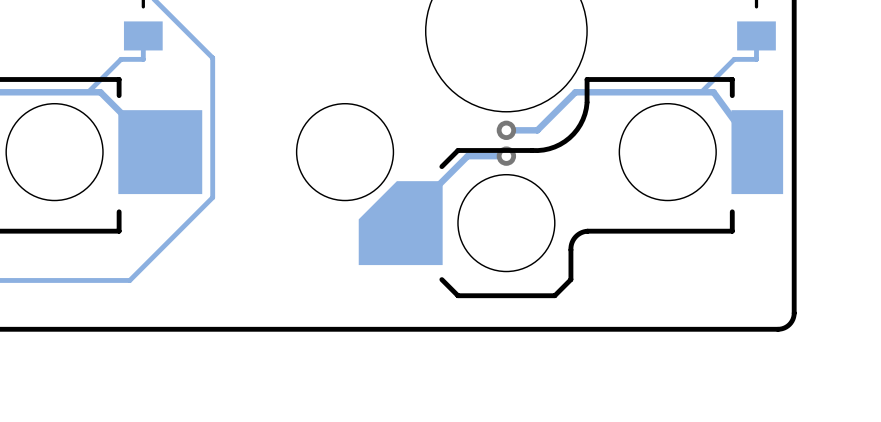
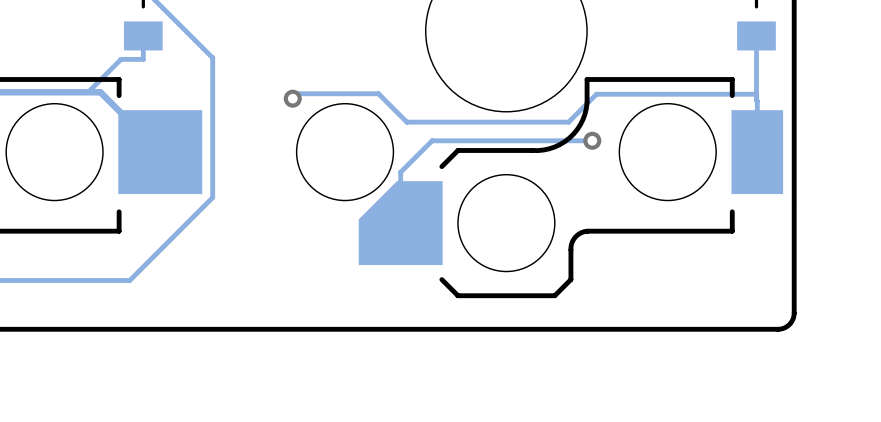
track: (756, 59) (734, 59) (701, 92) -> (756, 59) (757, 152)
track: none -> (756, 94) (596, 94) (568, 122) (406, 122) (378, 93) (297, 93) (292, 98)
via: none -> (292, 98)
track: (506, 130) (537, 130) (575, 92) (713, 92) (757, 152) -> none
via: (506, 130) -> none
via: none -> (592, 140)
track: (506, 156) (467, 156) (400, 223) -> (592, 140) (432, 140) (400, 172) (400, 223)
via: (506, 156) -> none

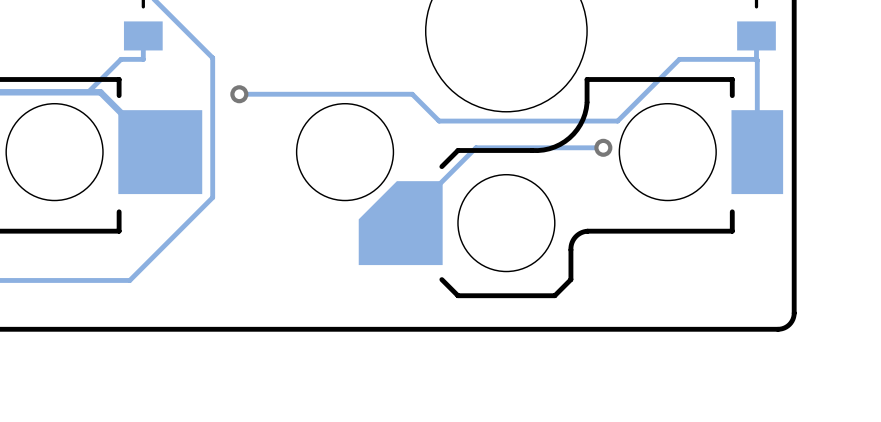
track: (756, 59) (757, 101) -> (239, 94) (412, 94) (439, 121) (617, 121) (679, 59) (756, 59) (757, 101)
track: (756, 94) (596, 94) (568, 122) (406, 122) (378, 93) (297, 93) (292, 98) -> none
via position: (292, 98) -> (239, 94)
track: (592, 140) (432, 140) (400, 172) (400, 223) -> (603, 147) (476, 147) (400, 223)
via position: (592, 140) -> (603, 147)

